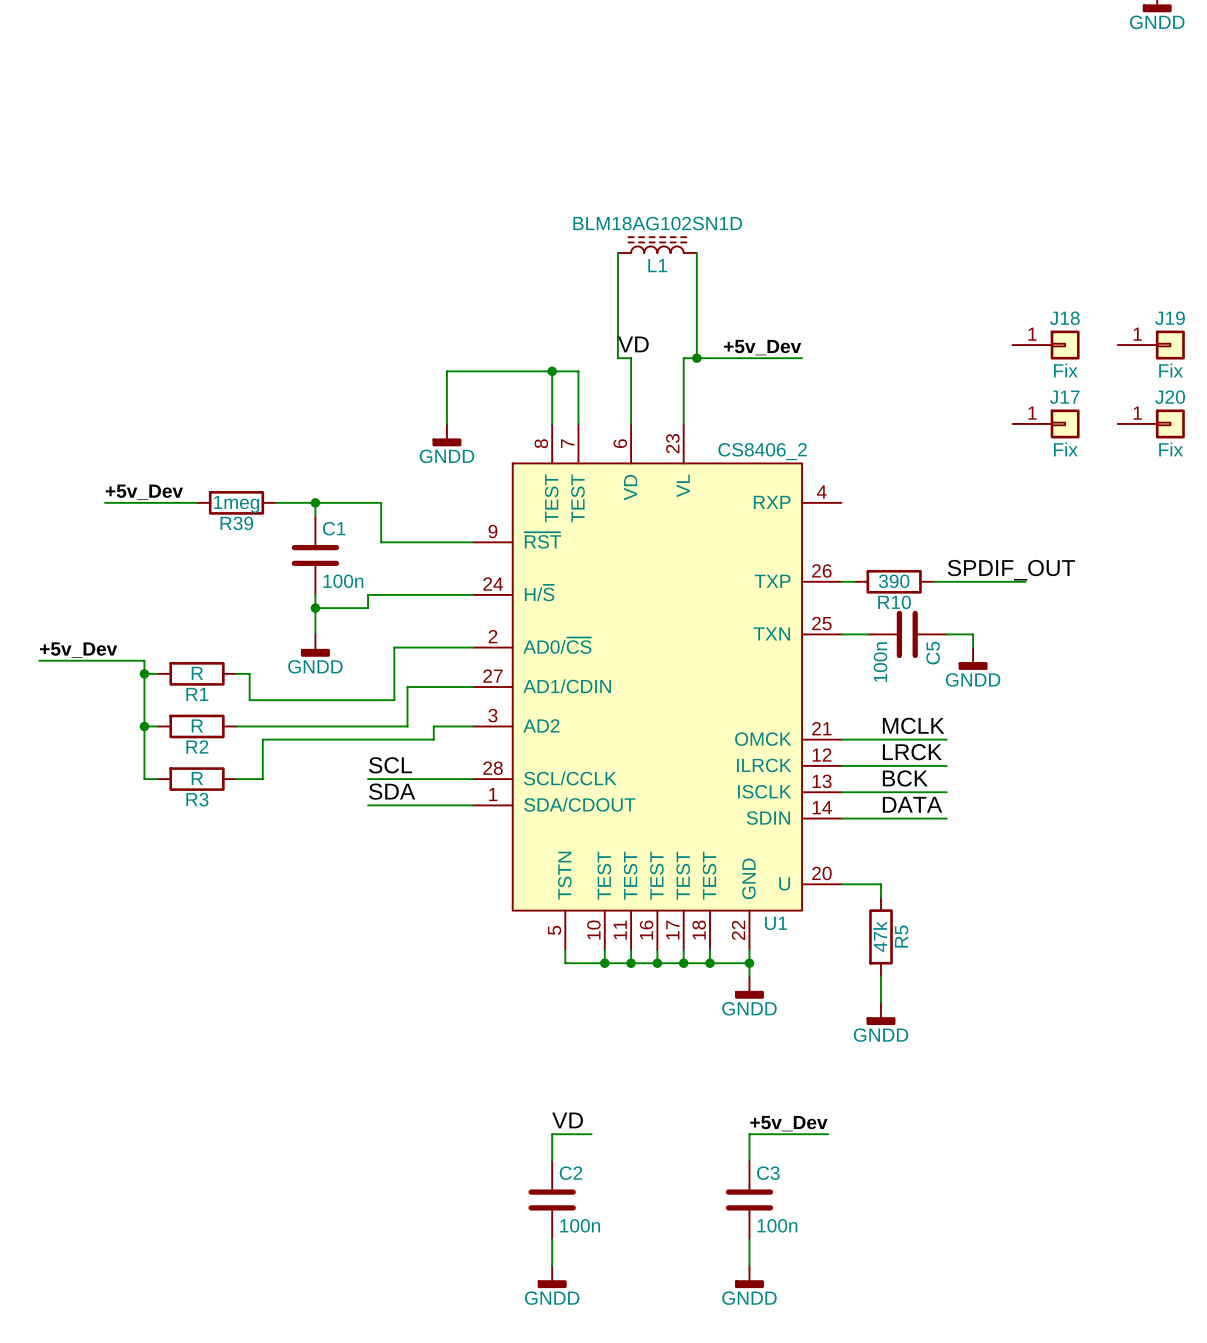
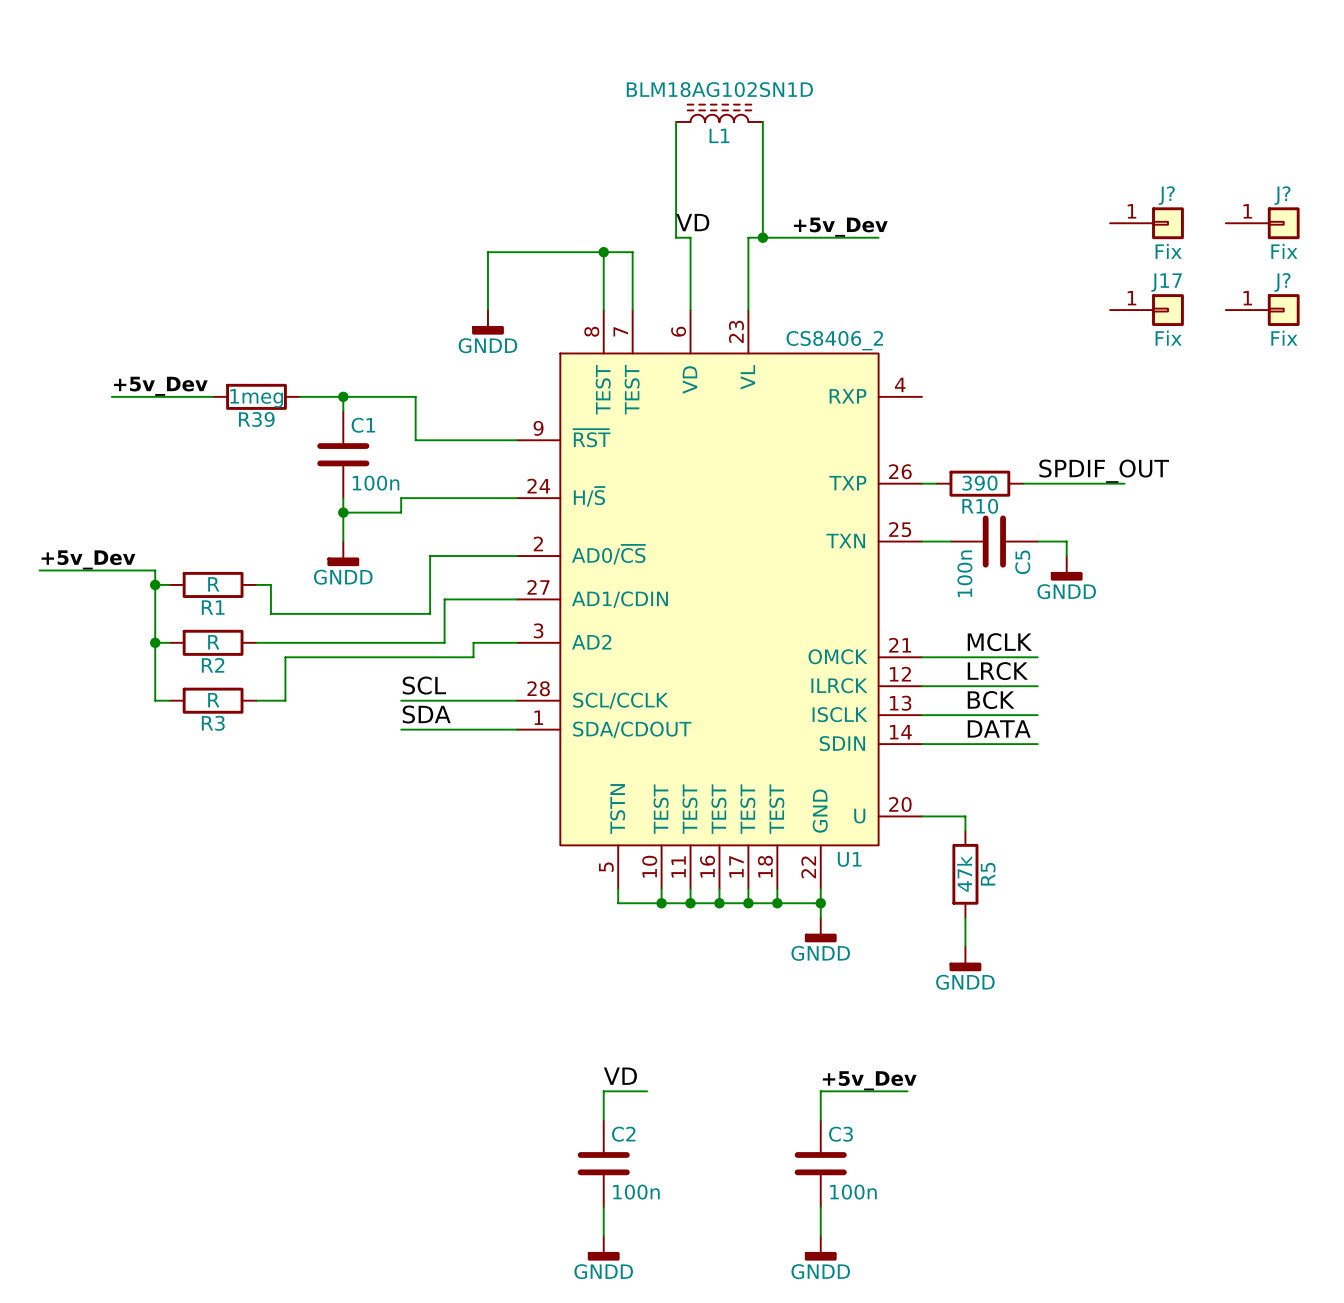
J18 name: J18 (1064, 318) -> J? (1166, 195)
J19 name: J19 (1170, 318) -> J? (1282, 195)
J20 name: J20 (1170, 397) -> J? (1282, 282)

